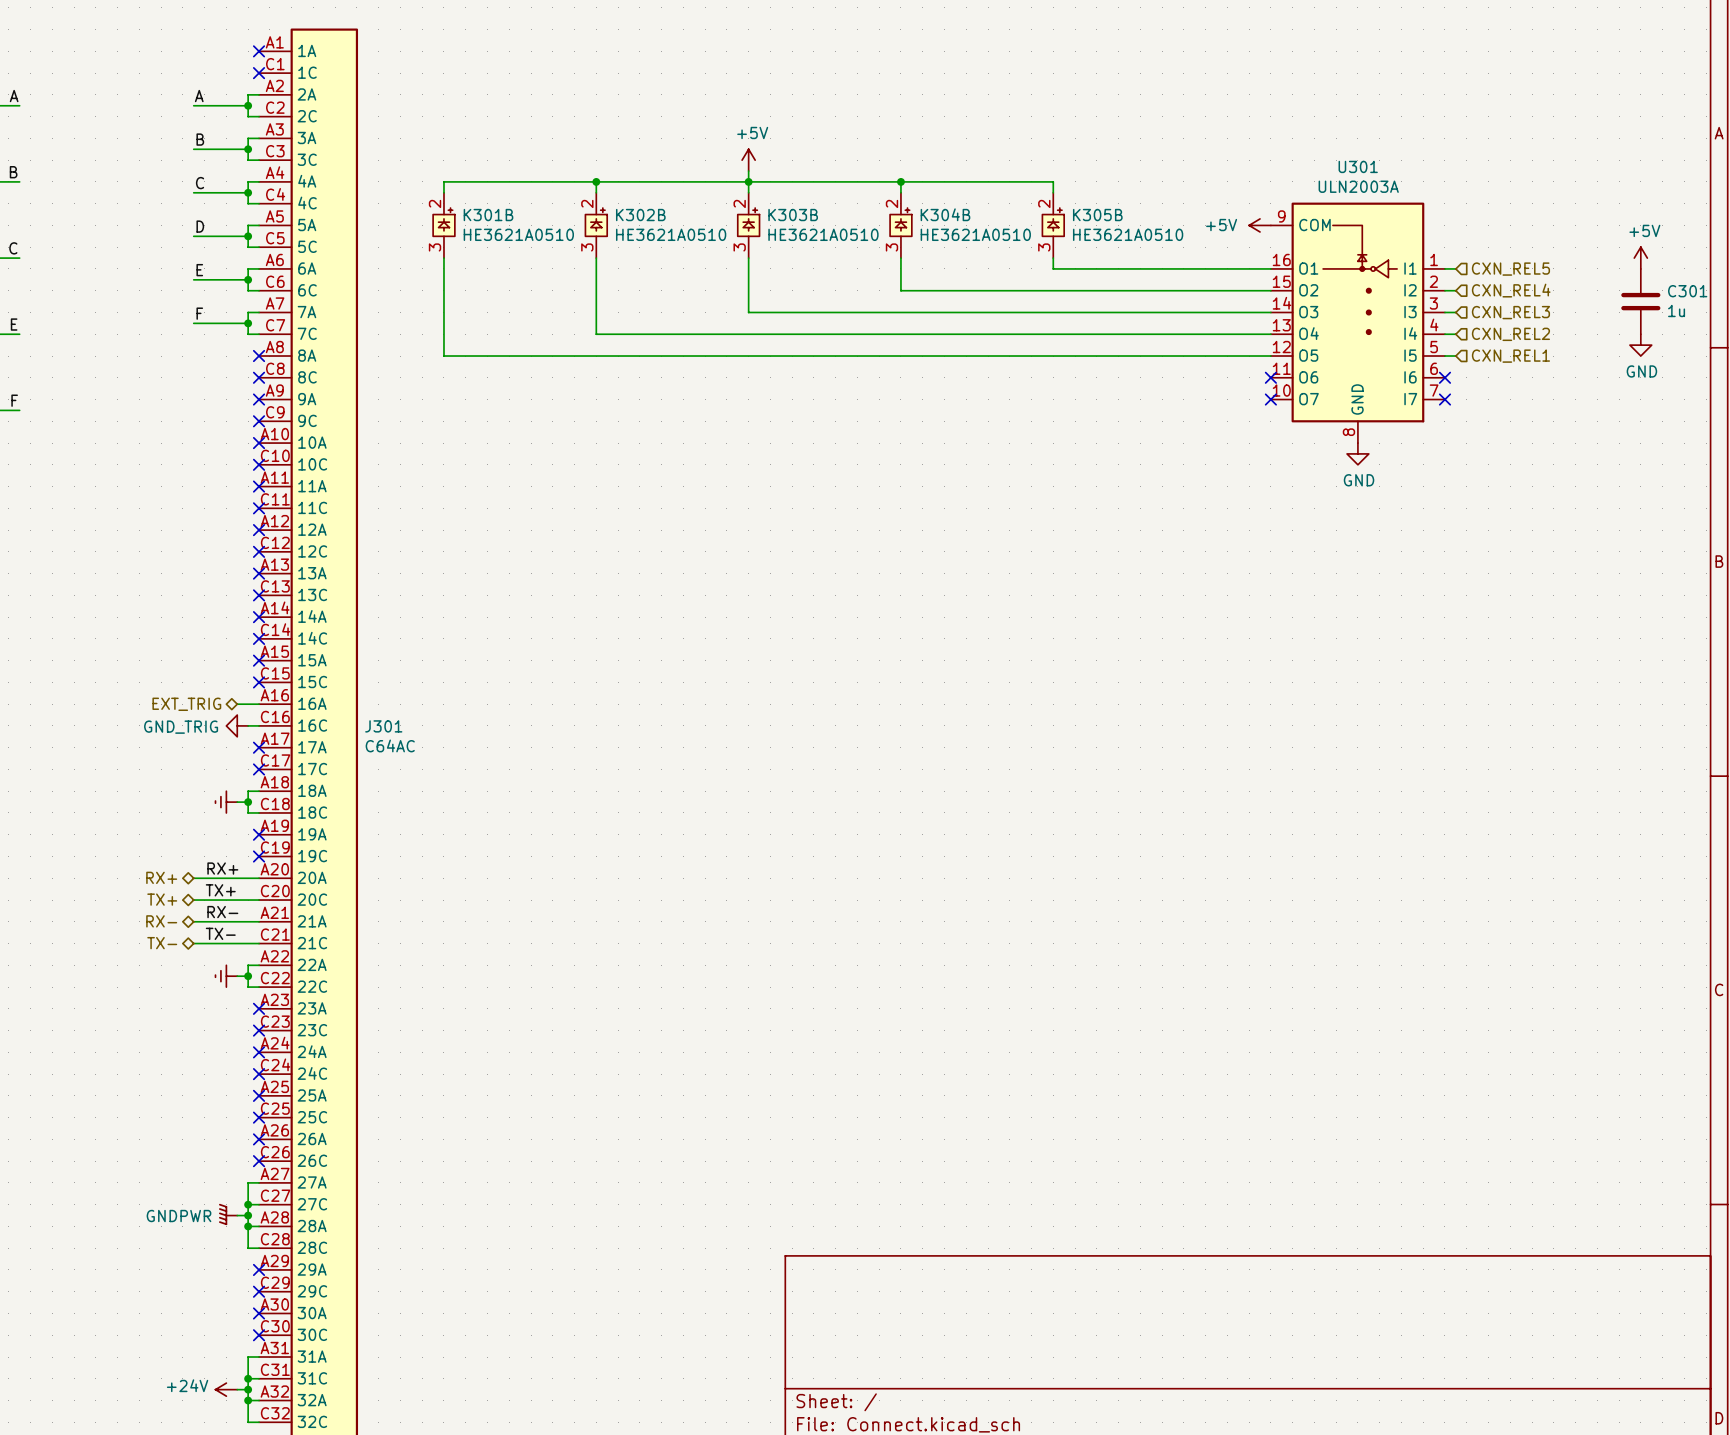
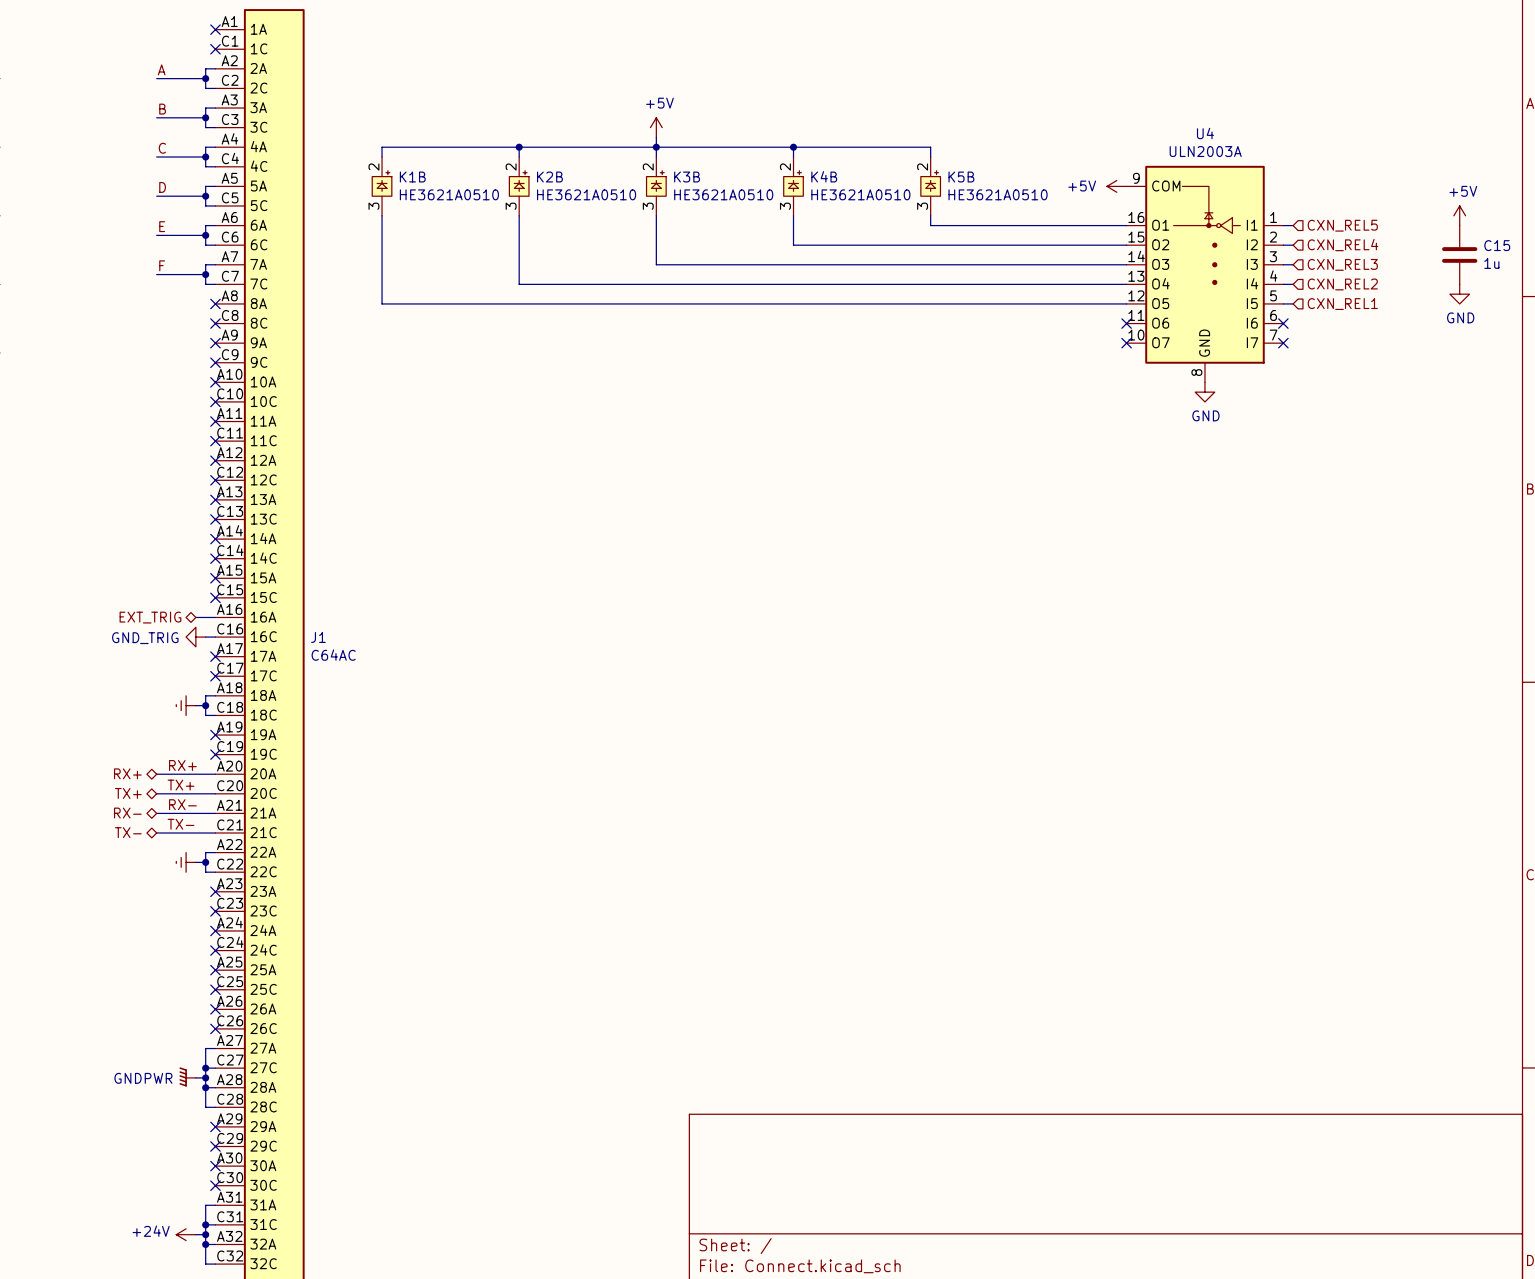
U301 name: U301 (1358, 166) -> U4 (1205, 133)
K304B name: K304B (945, 214) -> K4B (824, 176)
K301B name: K301B (488, 215) -> K1B (412, 177)
K302B name: K302B (640, 215) -> K2B (549, 177)
K303B name: K303B (793, 215) -> K3B (687, 177)
K305B name: K305B (1097, 215) -> K5B (961, 177)
C301 name: C301 (1687, 291) -> C15 (1497, 245)
J301 name: J301 (383, 726) -> J1 (318, 637)

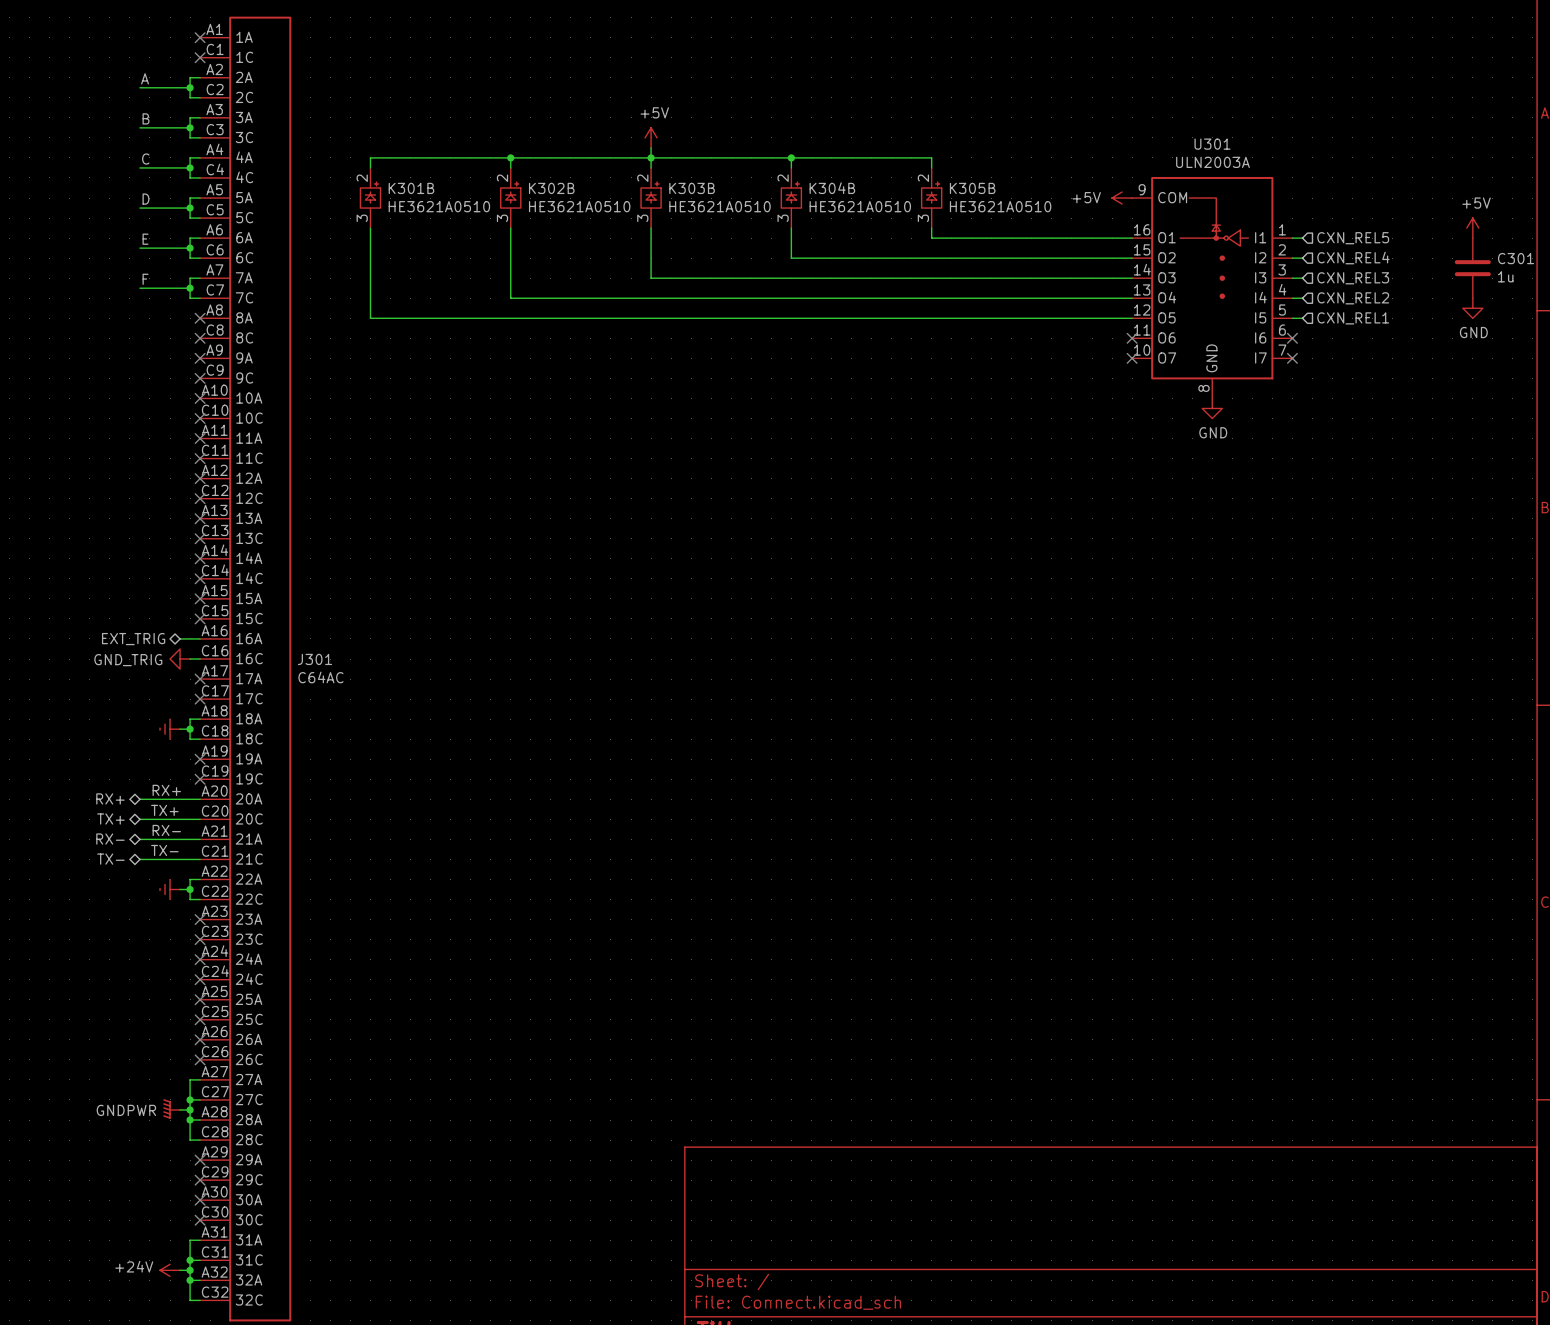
U4 name: U4 (1205, 133) -> U301 (1212, 144)
K4B name: K4B (824, 176) -> K304B (832, 188)
K1B name: K1B (412, 177) -> K301B (411, 188)
K2B name: K2B (549, 177) -> K302B (551, 188)
K3B name: K3B (687, 177) -> K303B (692, 188)
K5B name: K5B (961, 177) -> K305B (972, 188)
C15 name: C15 (1497, 245) -> C301 (1516, 258)
J1 name: J1 (318, 637) -> J301 (314, 659)

